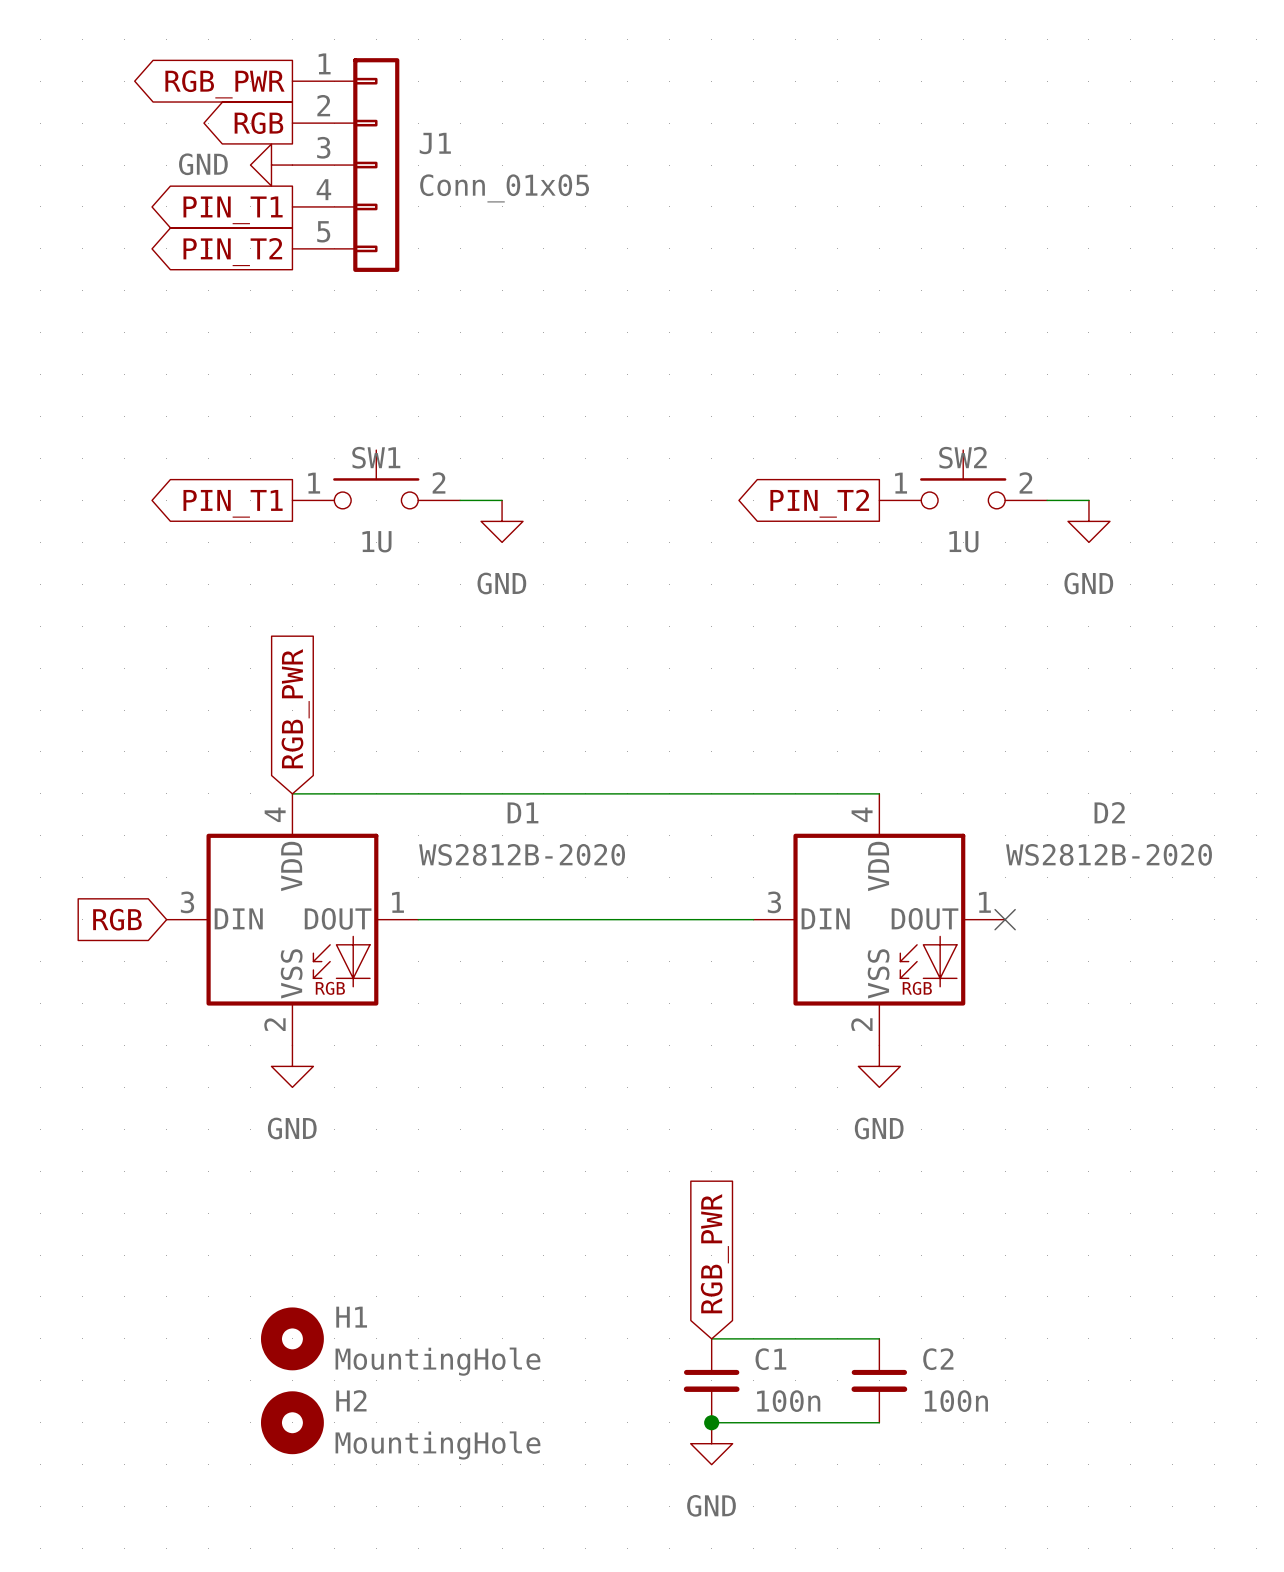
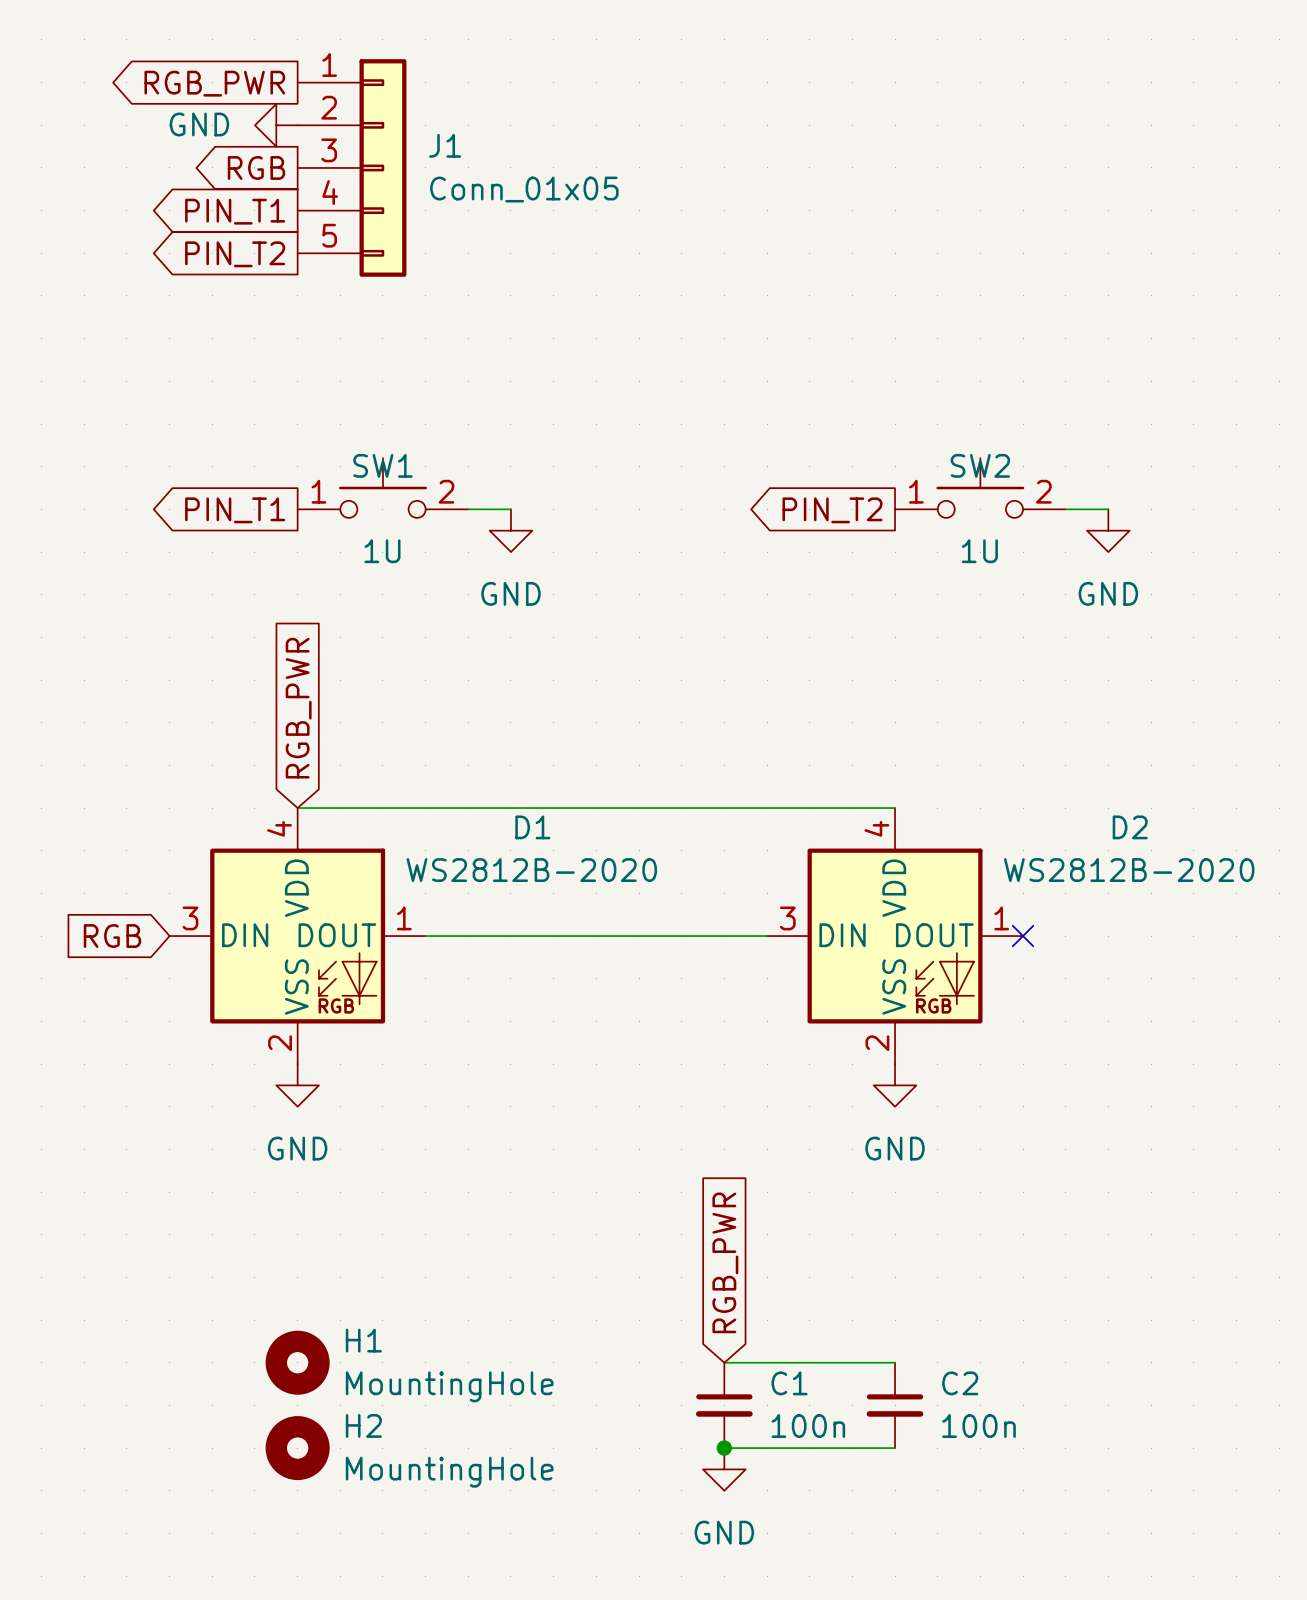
global label position: RGB (258, 123) -> RGB (256, 167)
power symbol position: GND (271, 165) -> GND (276, 125)

